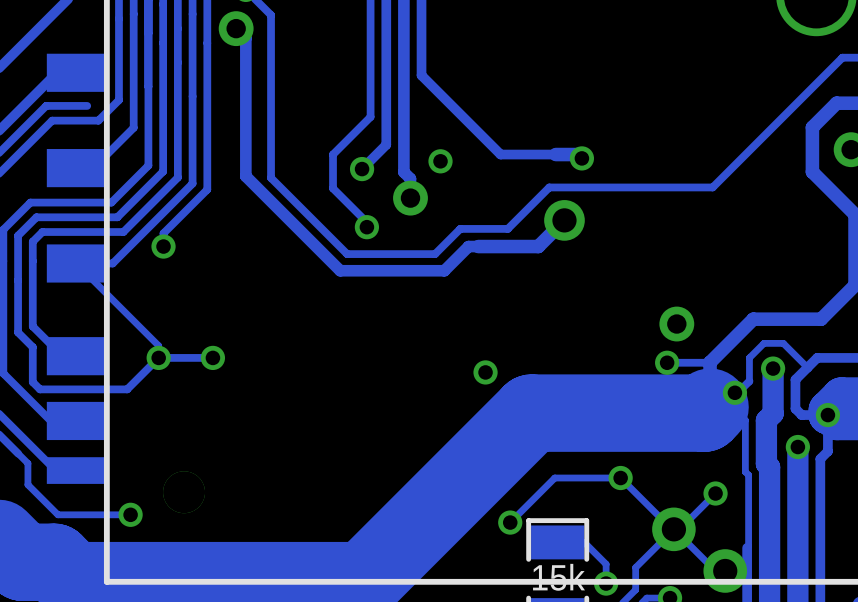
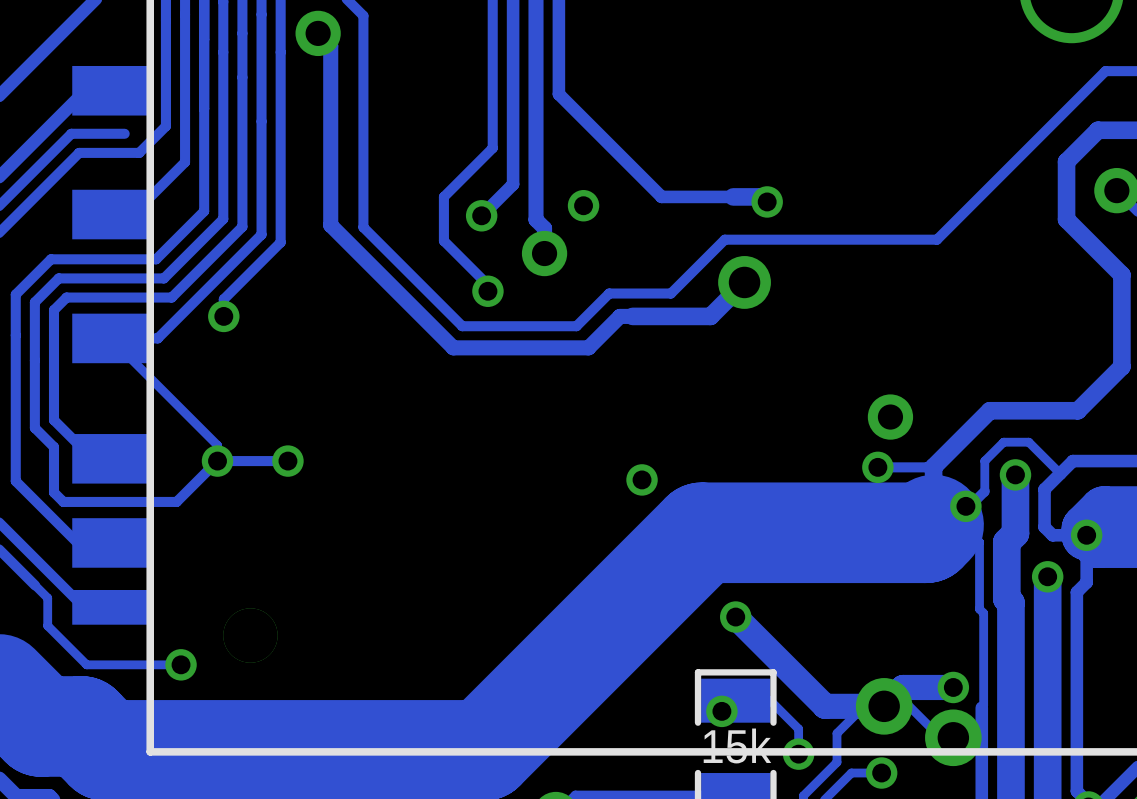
track: none -> (735, 617) (825, 706) (884, 706) (903, 687) (953, 687)
part: none -> (735, 617)
part: (620, 478) -> none
track: (715, 493) (679, 529) (671, 529) (620, 478) (554, 478) (510, 522) -> none
part position: (715, 493) -> (953, 687)
part: (510, 522) -> none
part position: (673, 529) -> (884, 706)
part: none -> (721, 711)

